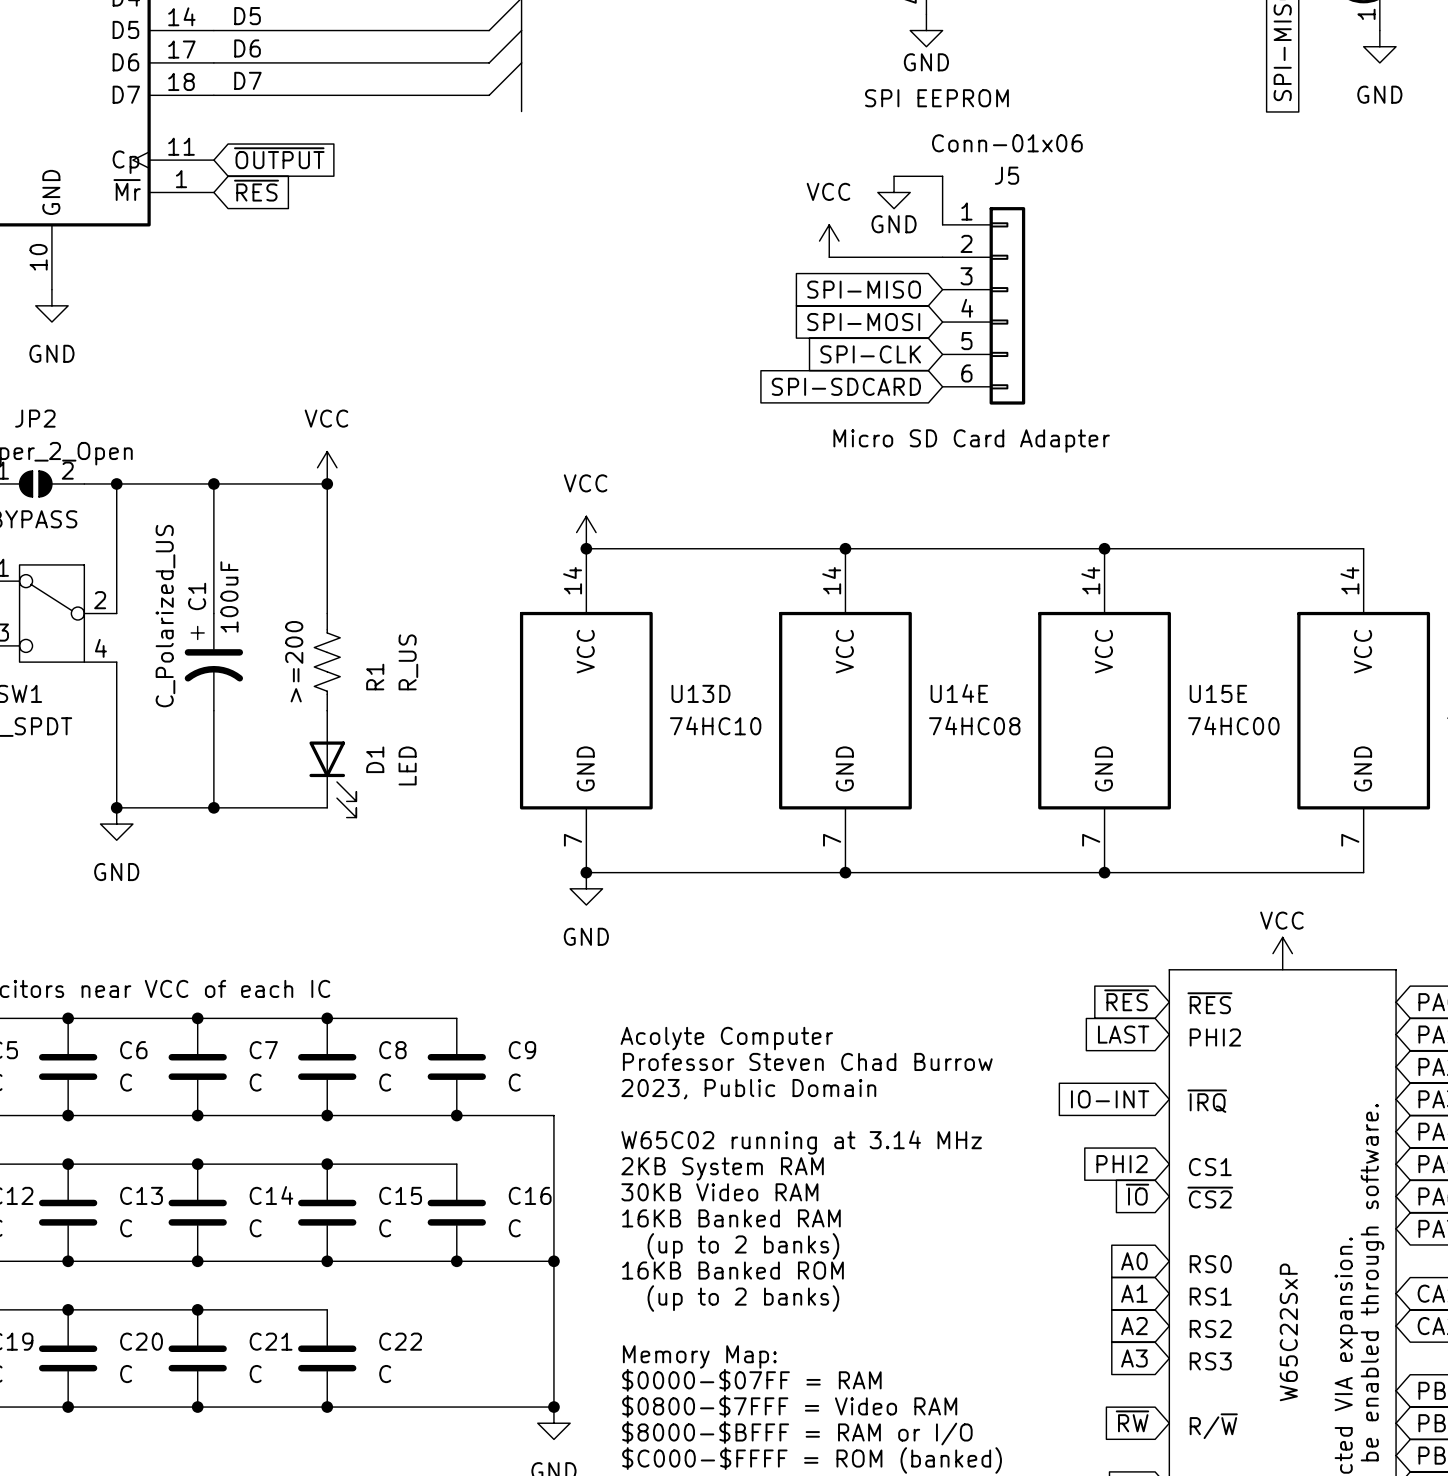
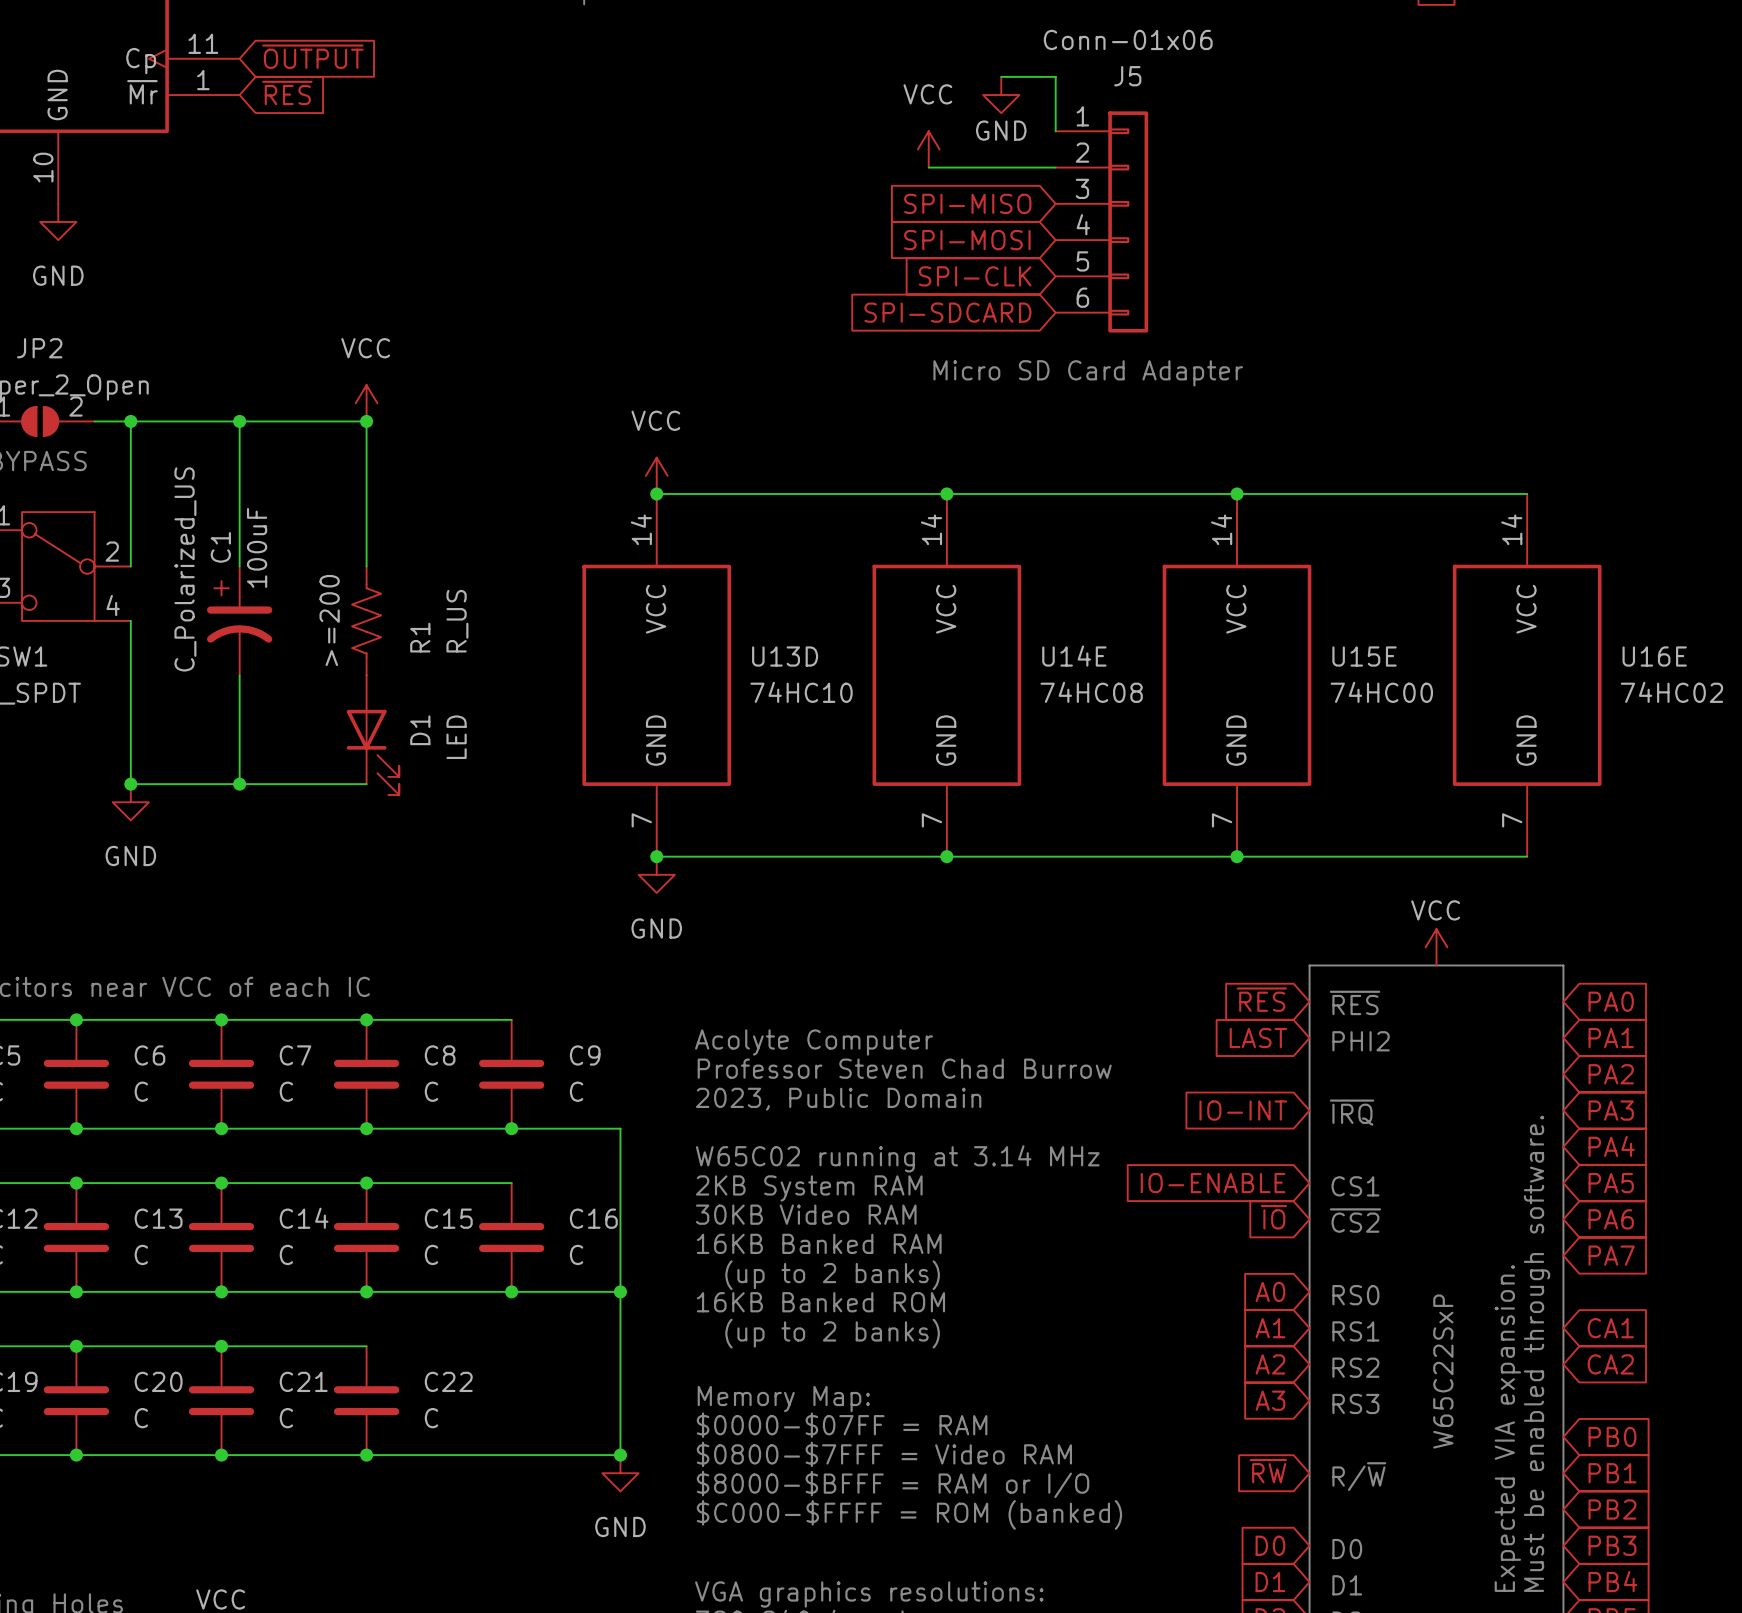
global label: PHI2 (1122, 1164) -> IO-ENABLE (1213, 1183)

